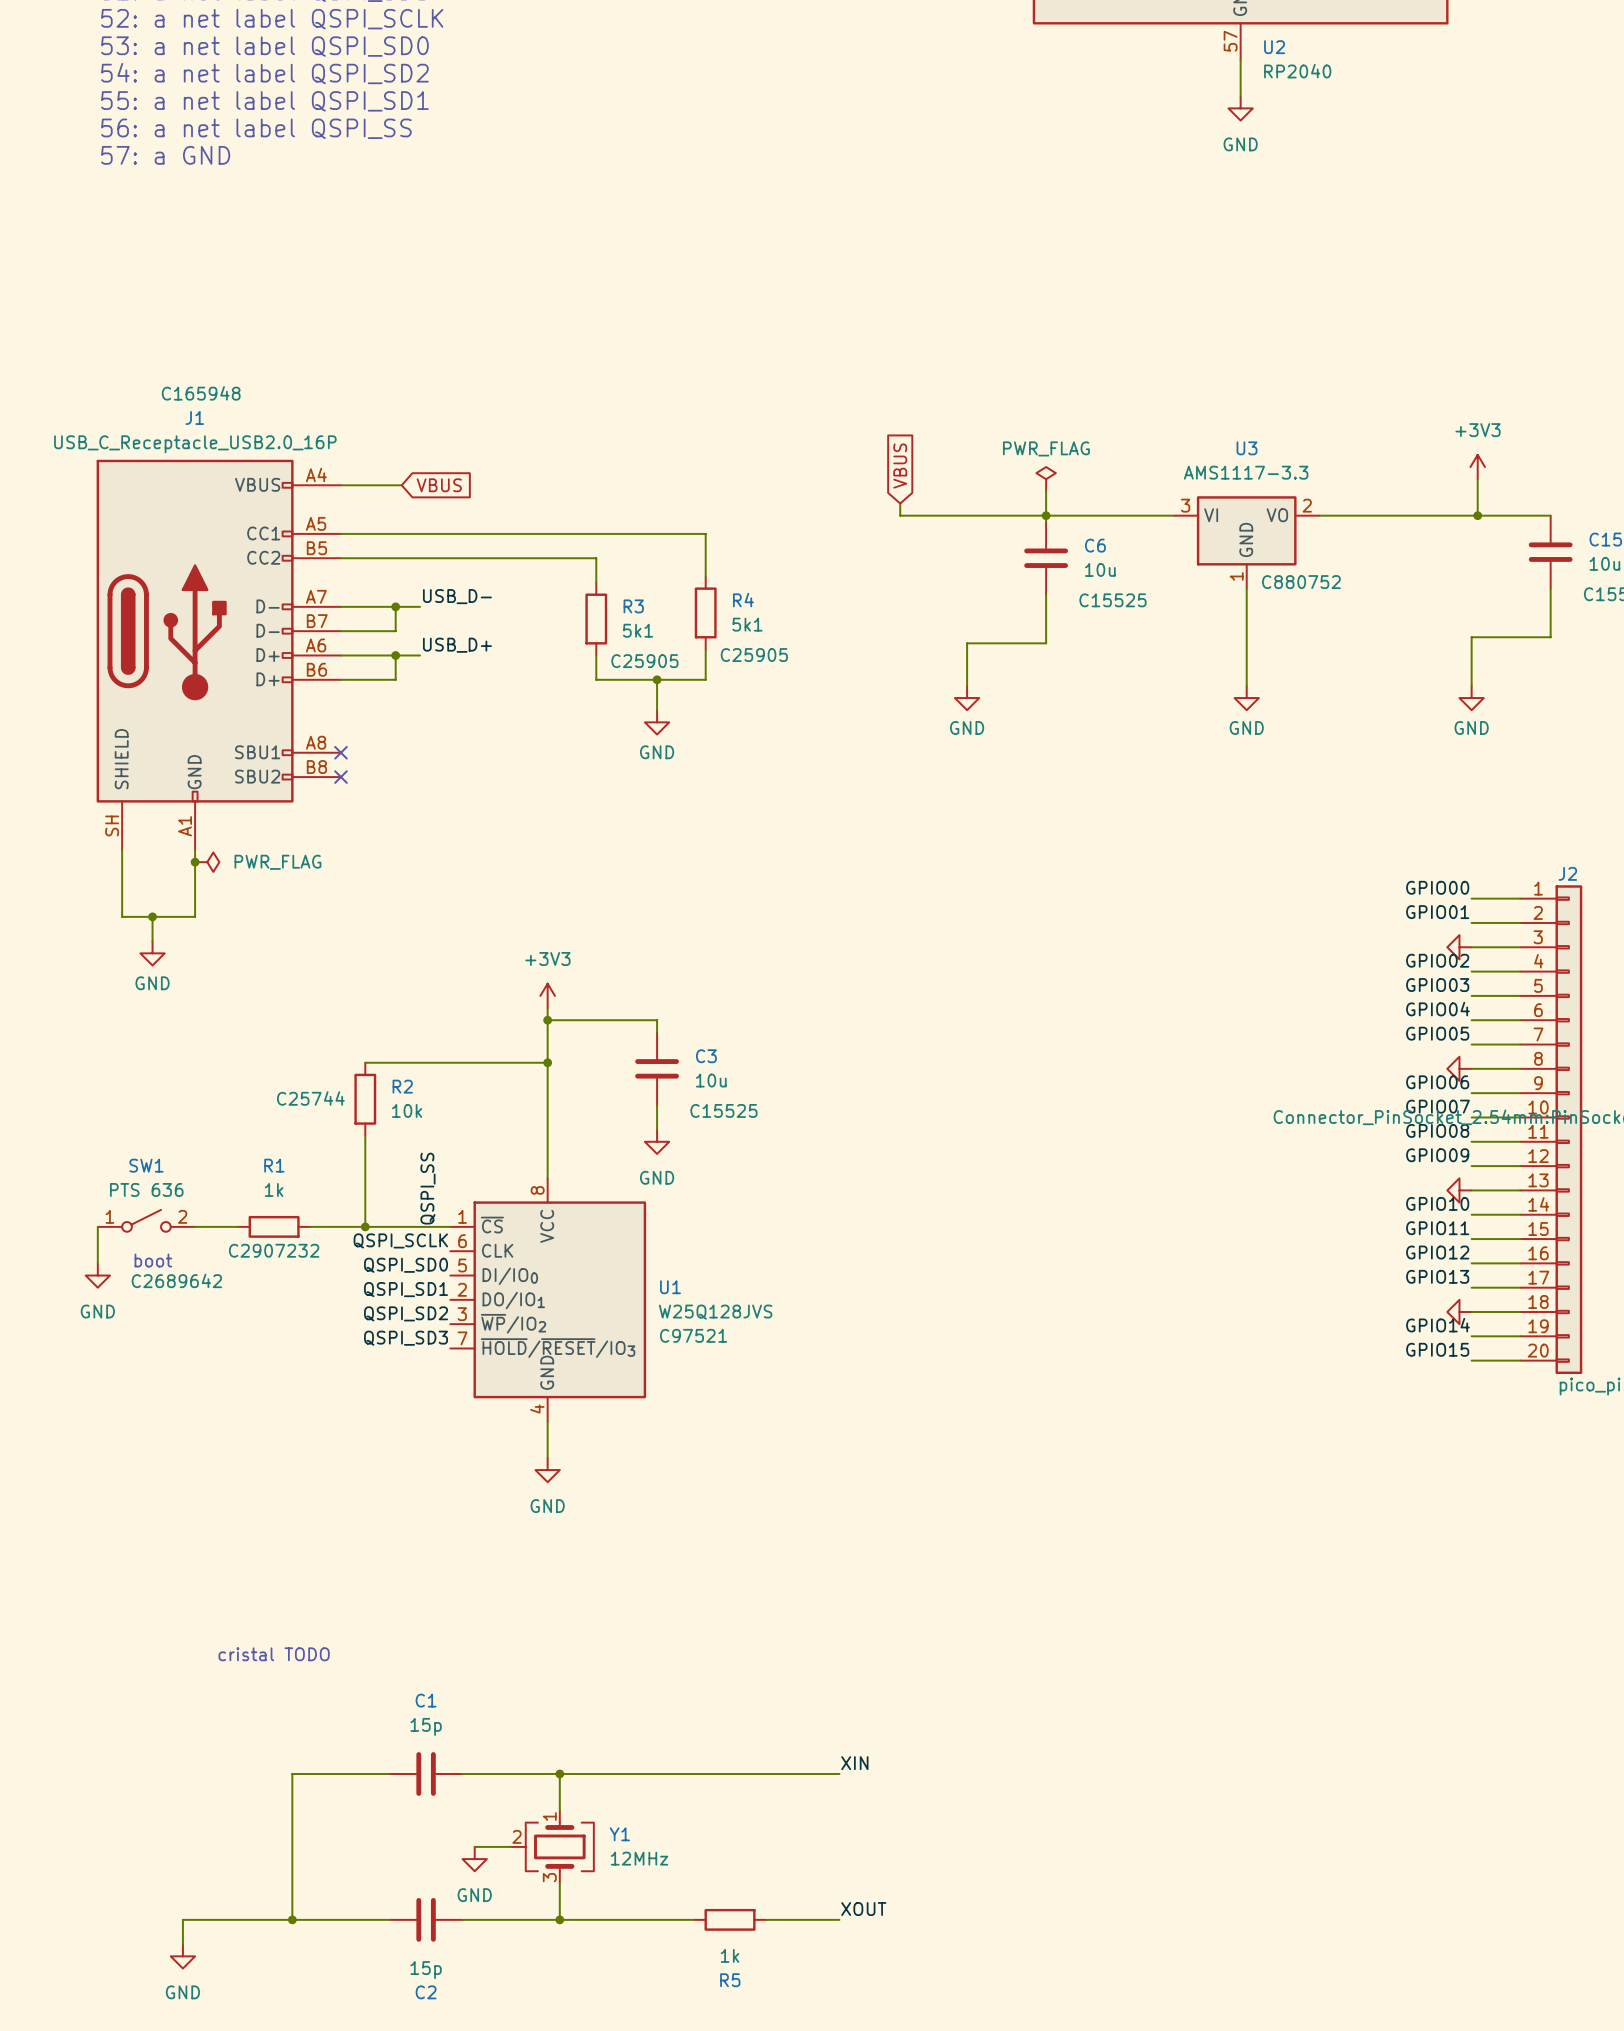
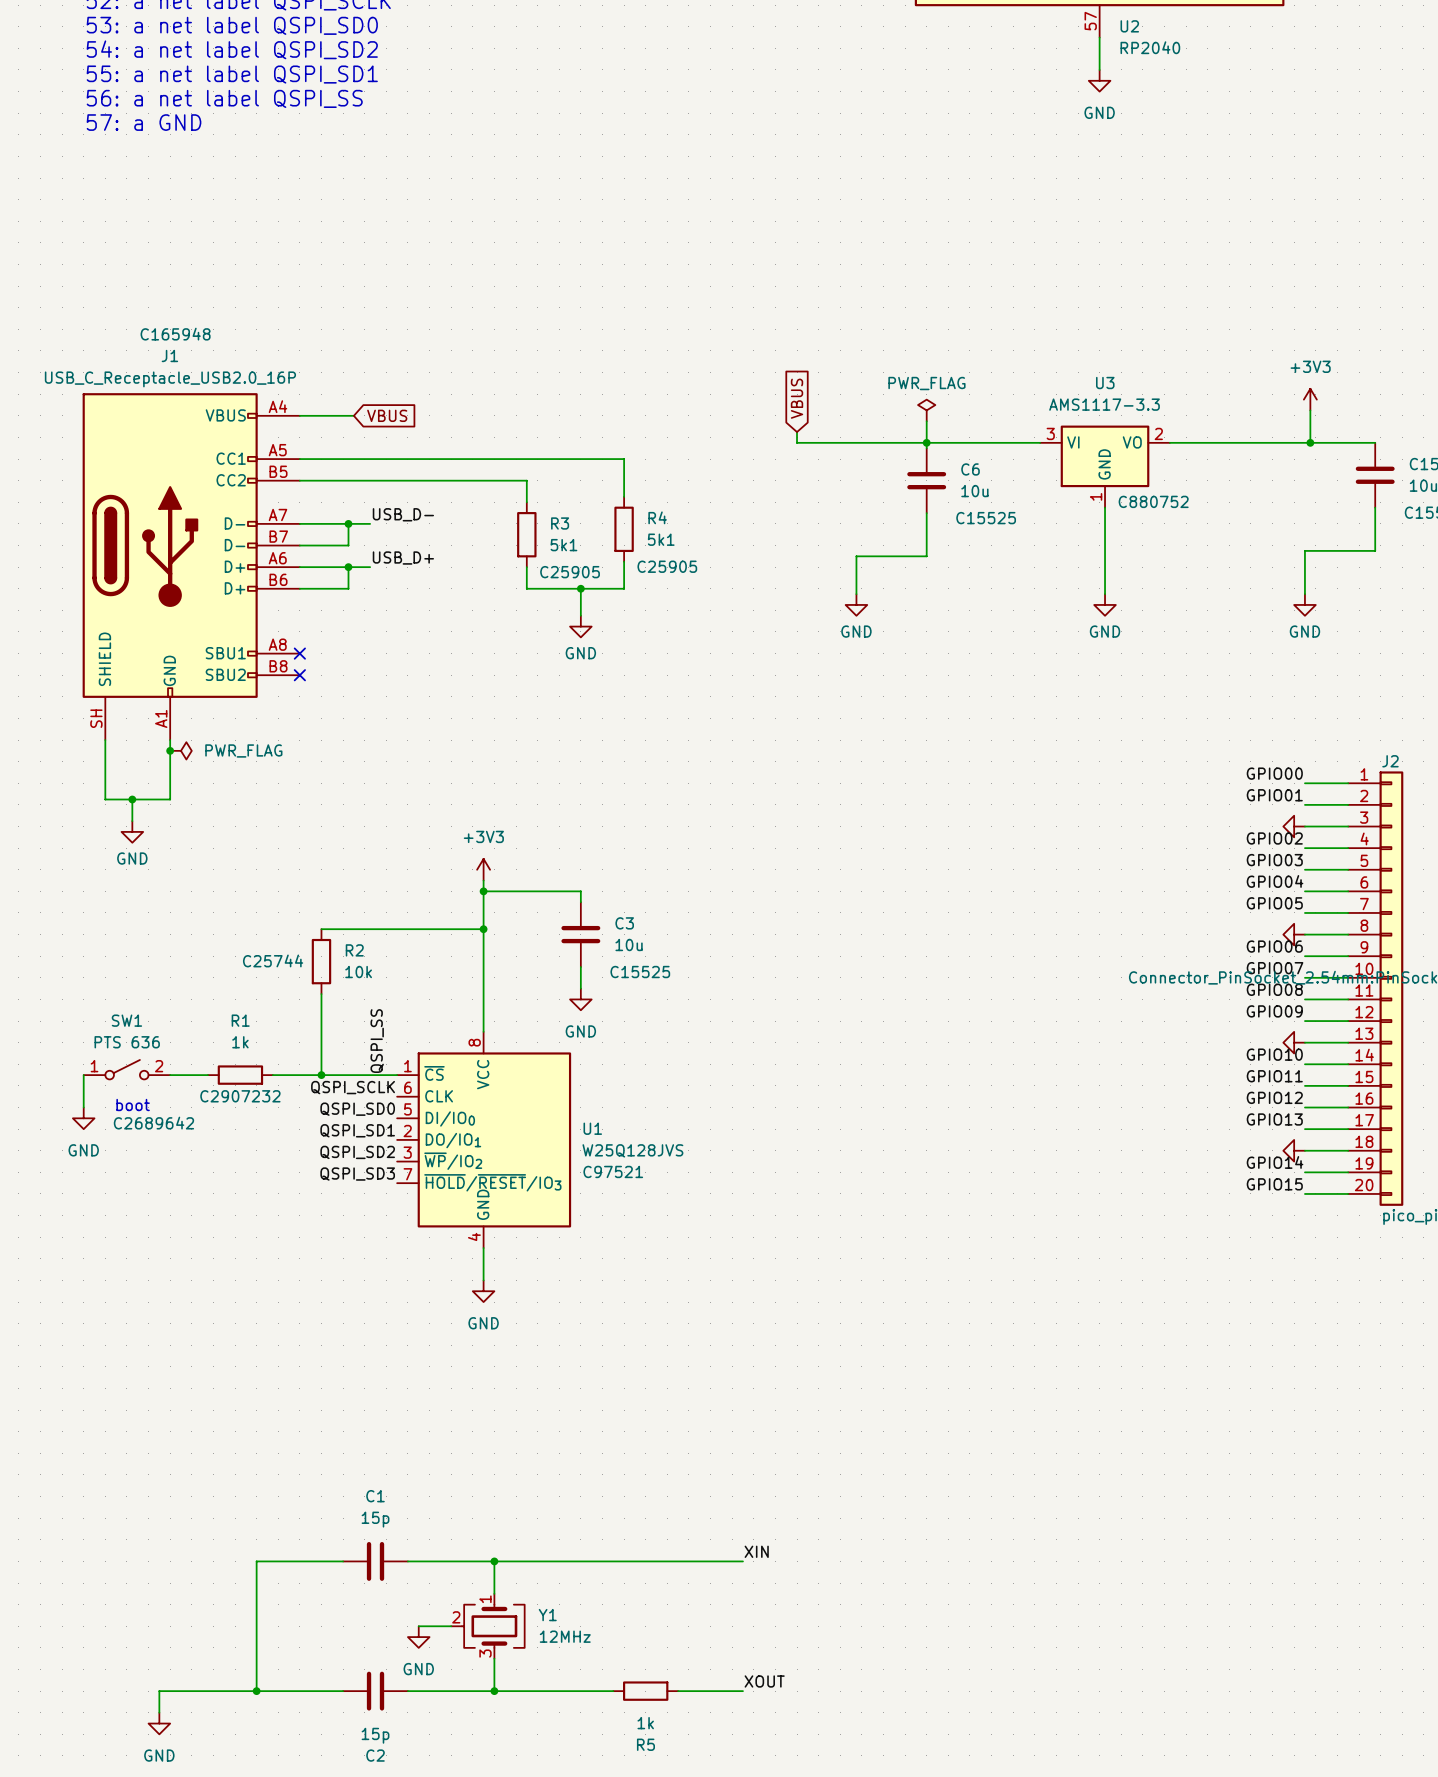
text: cristal TODO (274, 1654) -> none

